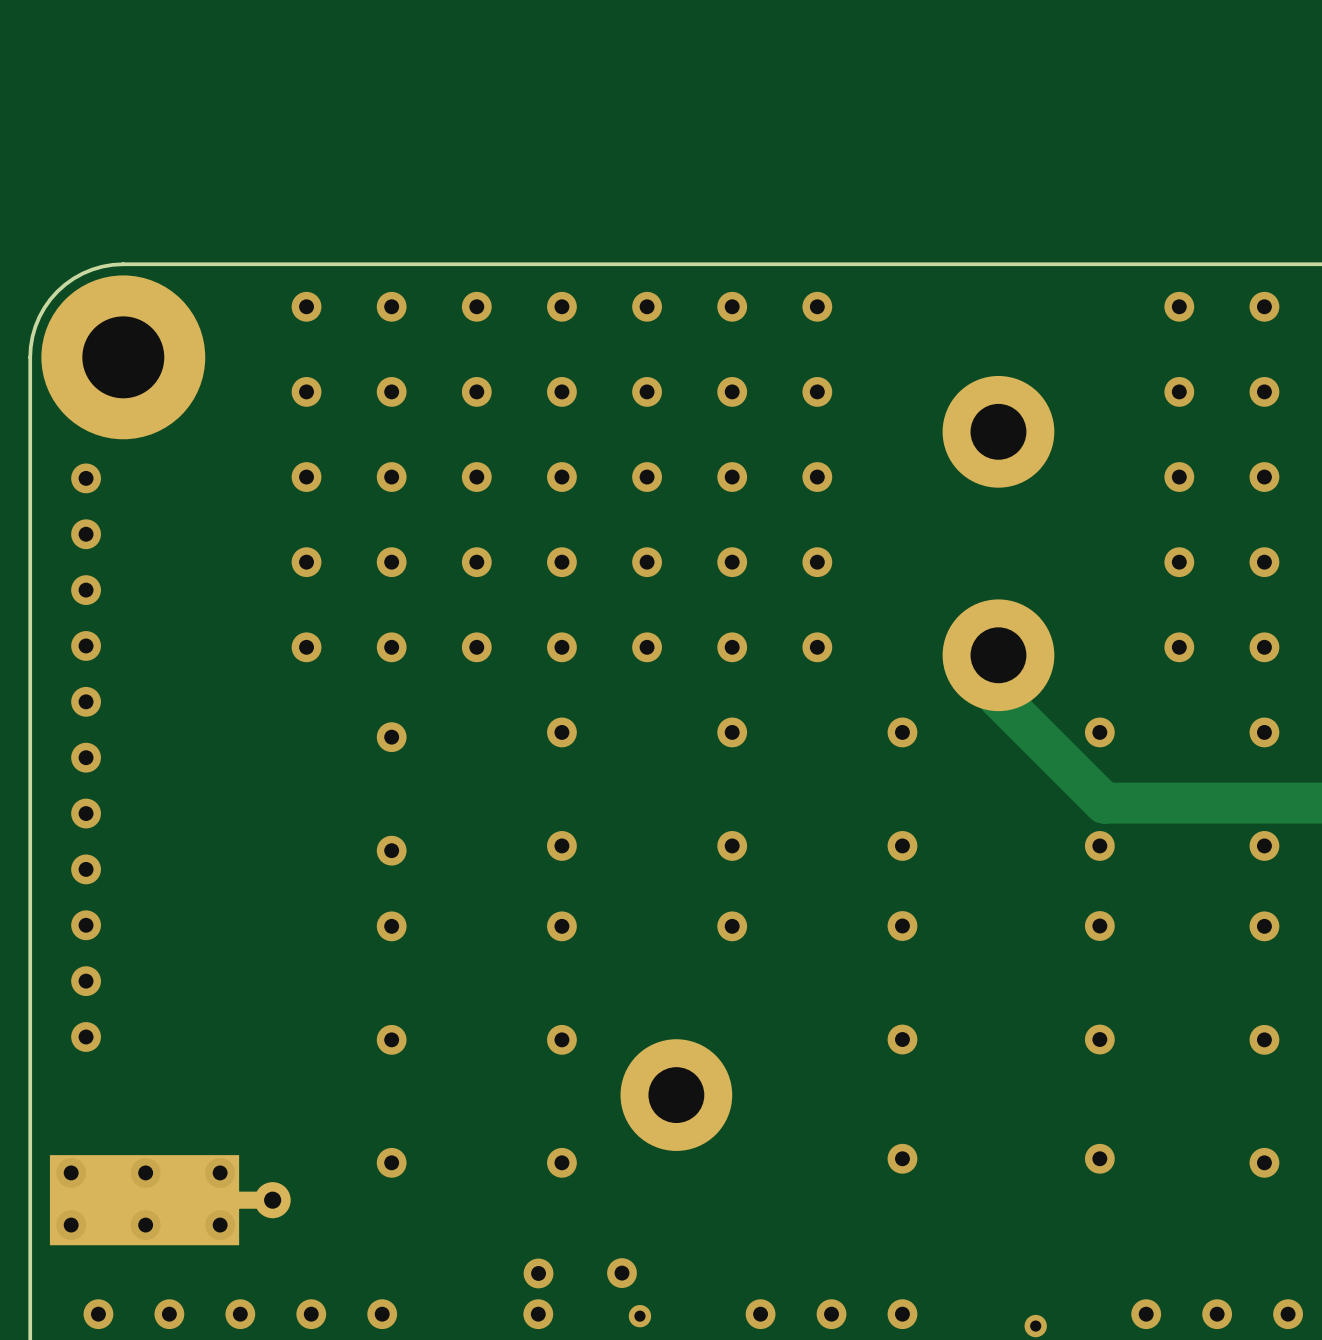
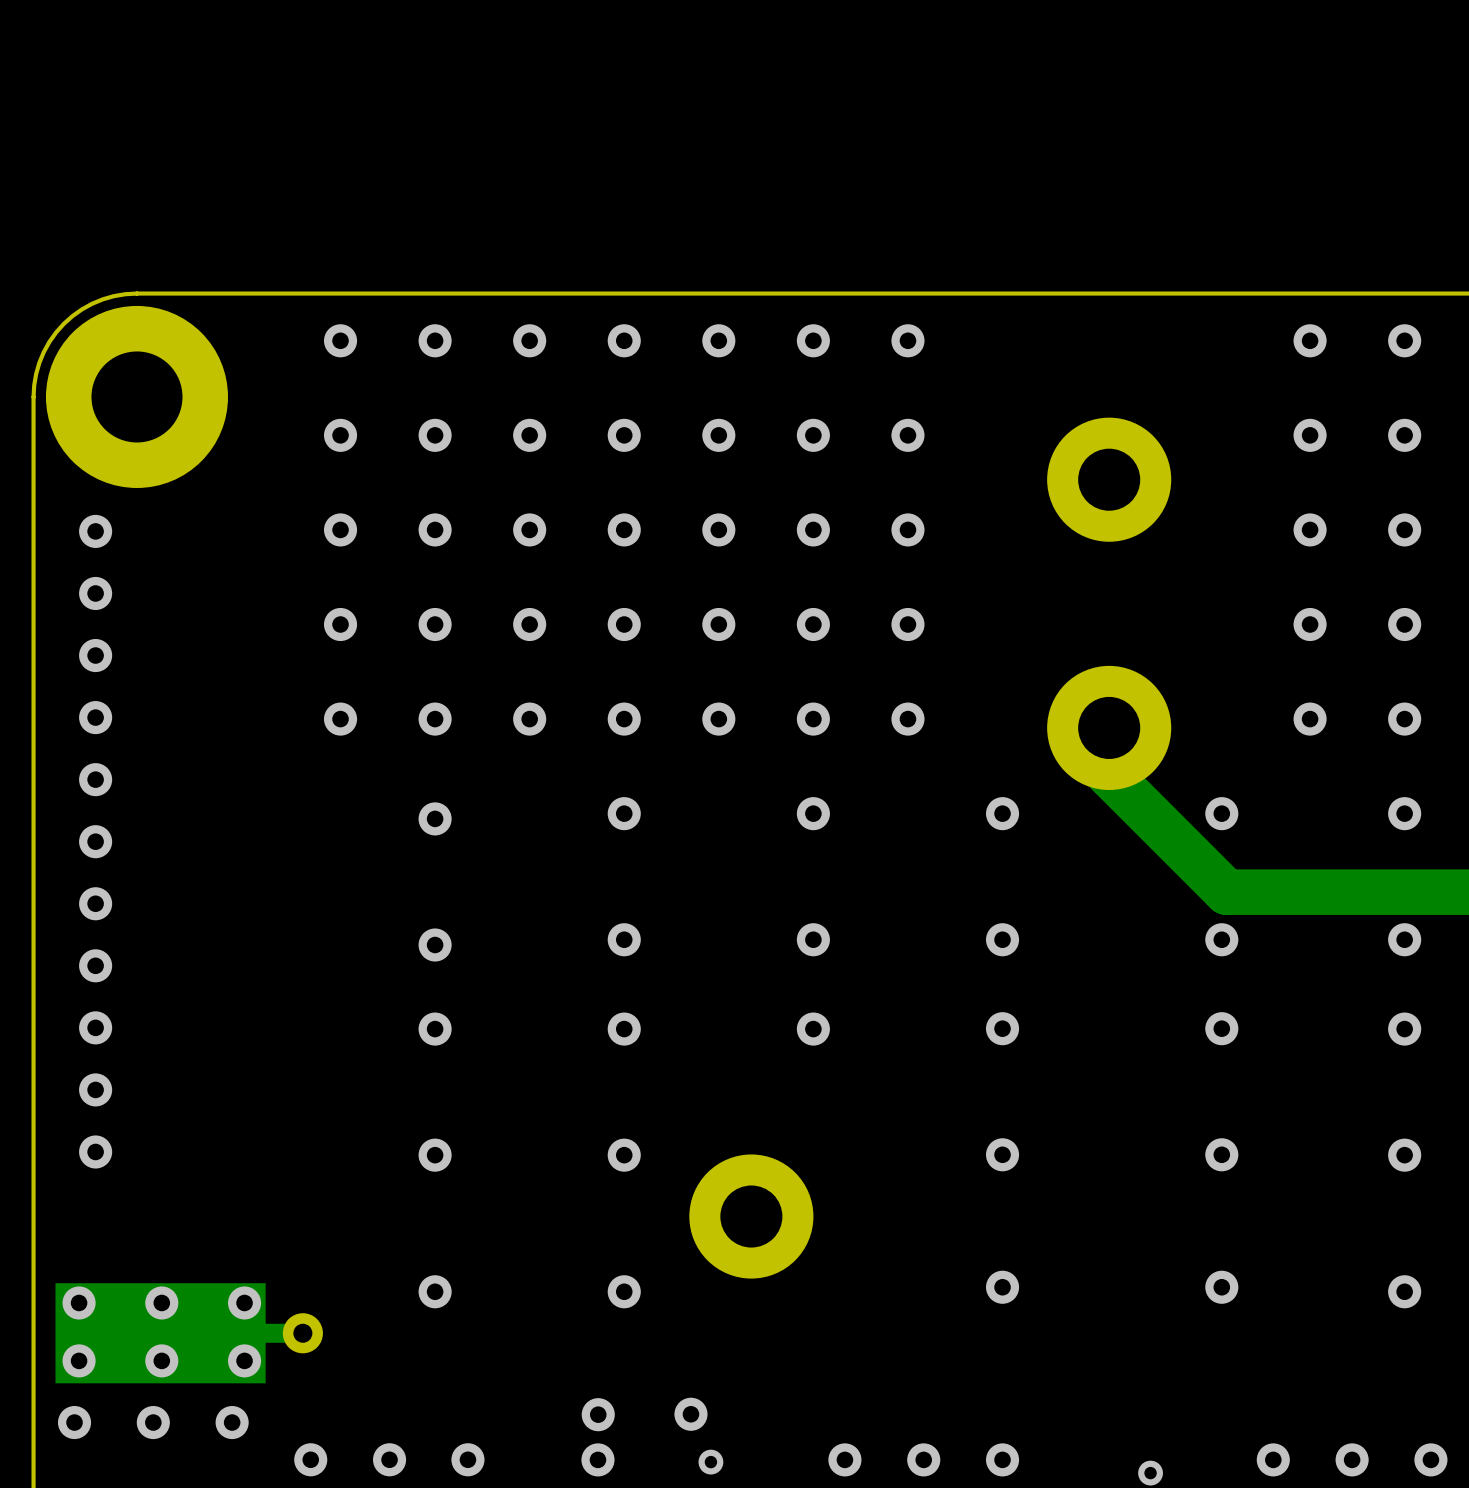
via: none -> (74, 1422)
via: none -> (153, 1422)
via: none -> (232, 1422)
via: (98, 1314) -> none
via: (169, 1314) -> none
via: (240, 1314) -> none
via: none -> (310, 1459)
via: (311, 1314) -> none
via: none -> (389, 1459)
via: (382, 1314) -> none
via: none -> (467, 1459)

